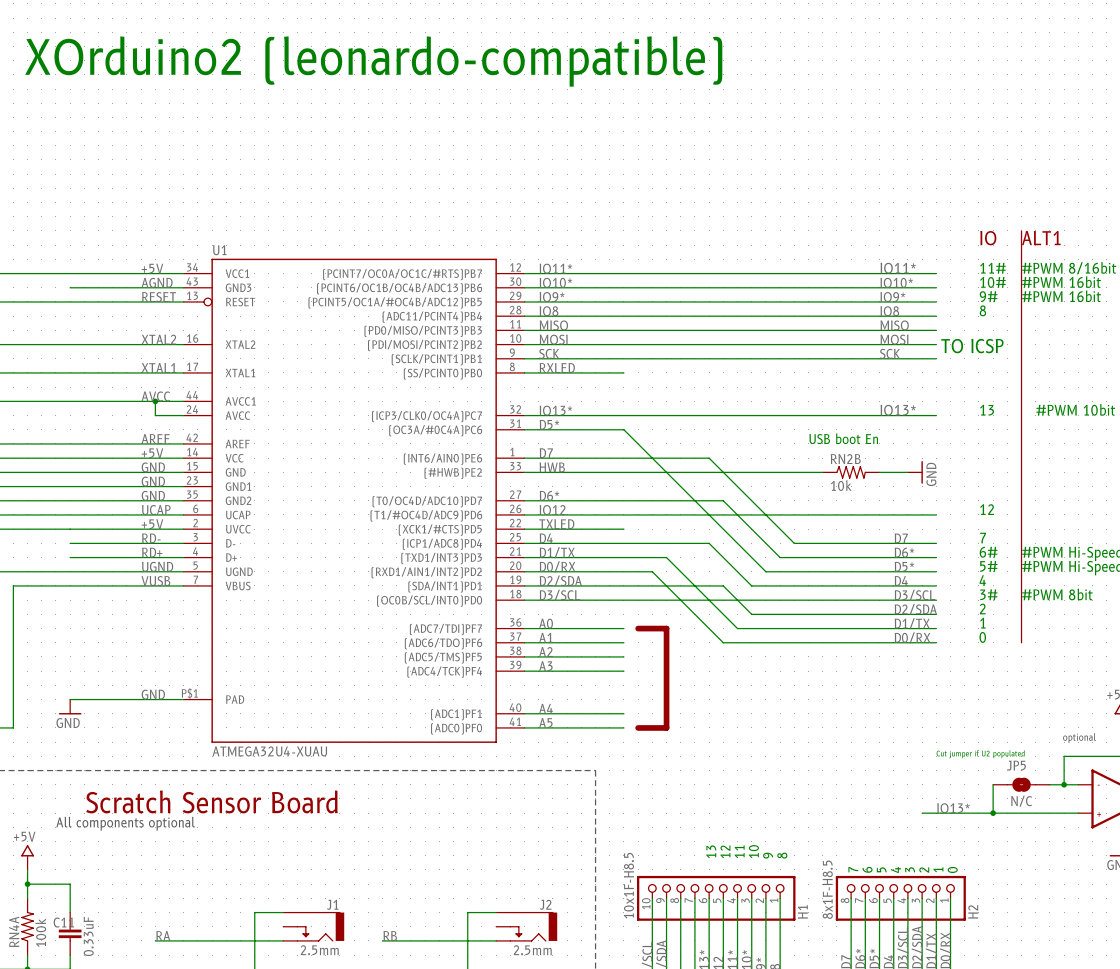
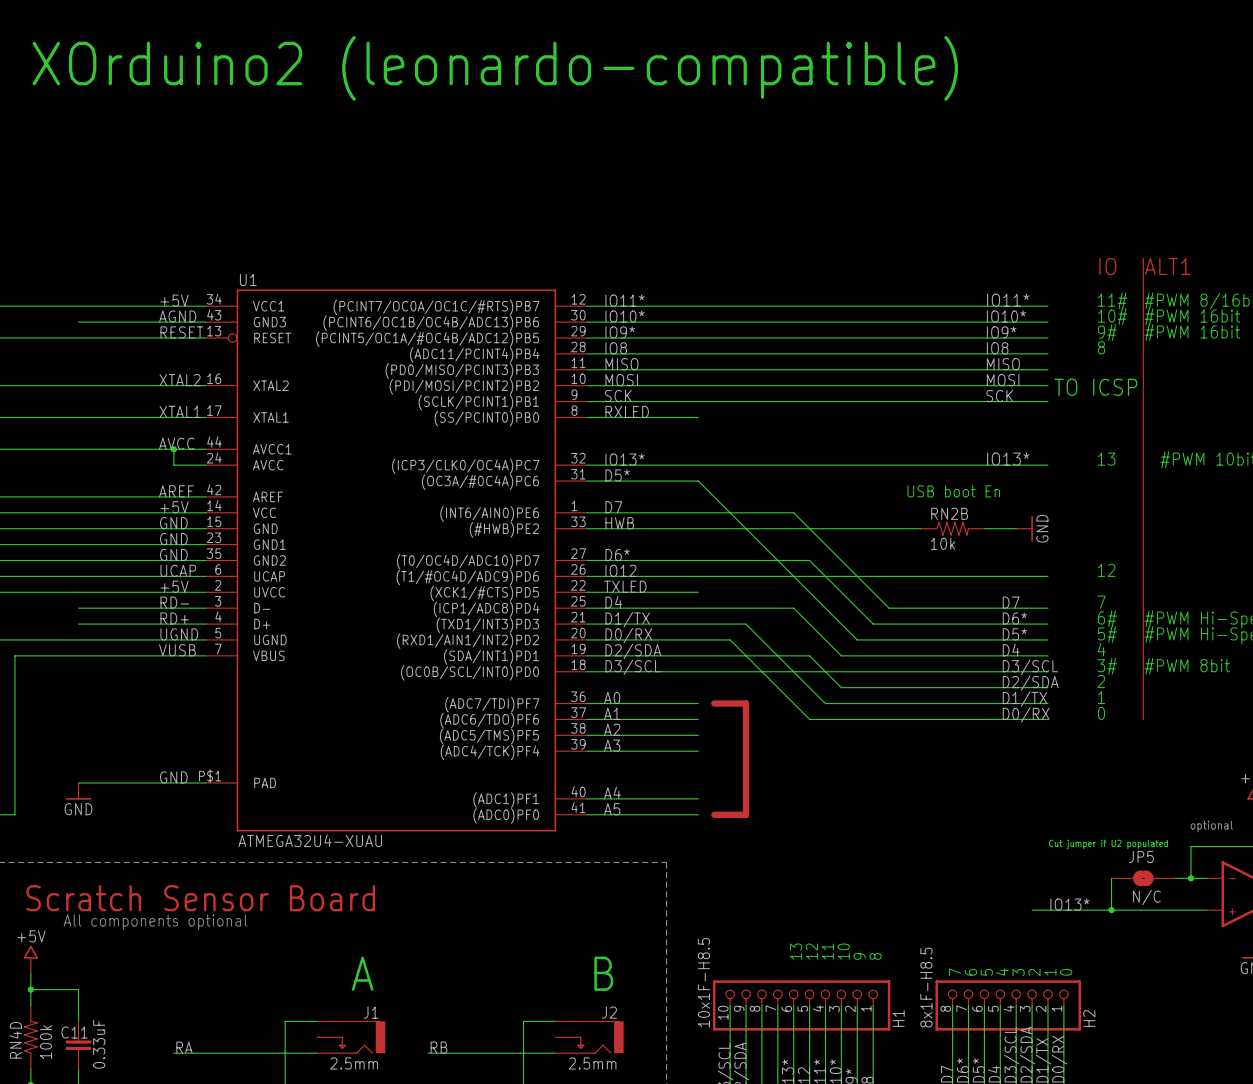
text: none -> A (362, 973)
text: none -> B (603, 973)
RN4A name: RN4A (14, 931) -> RN4D (15, 1040)

